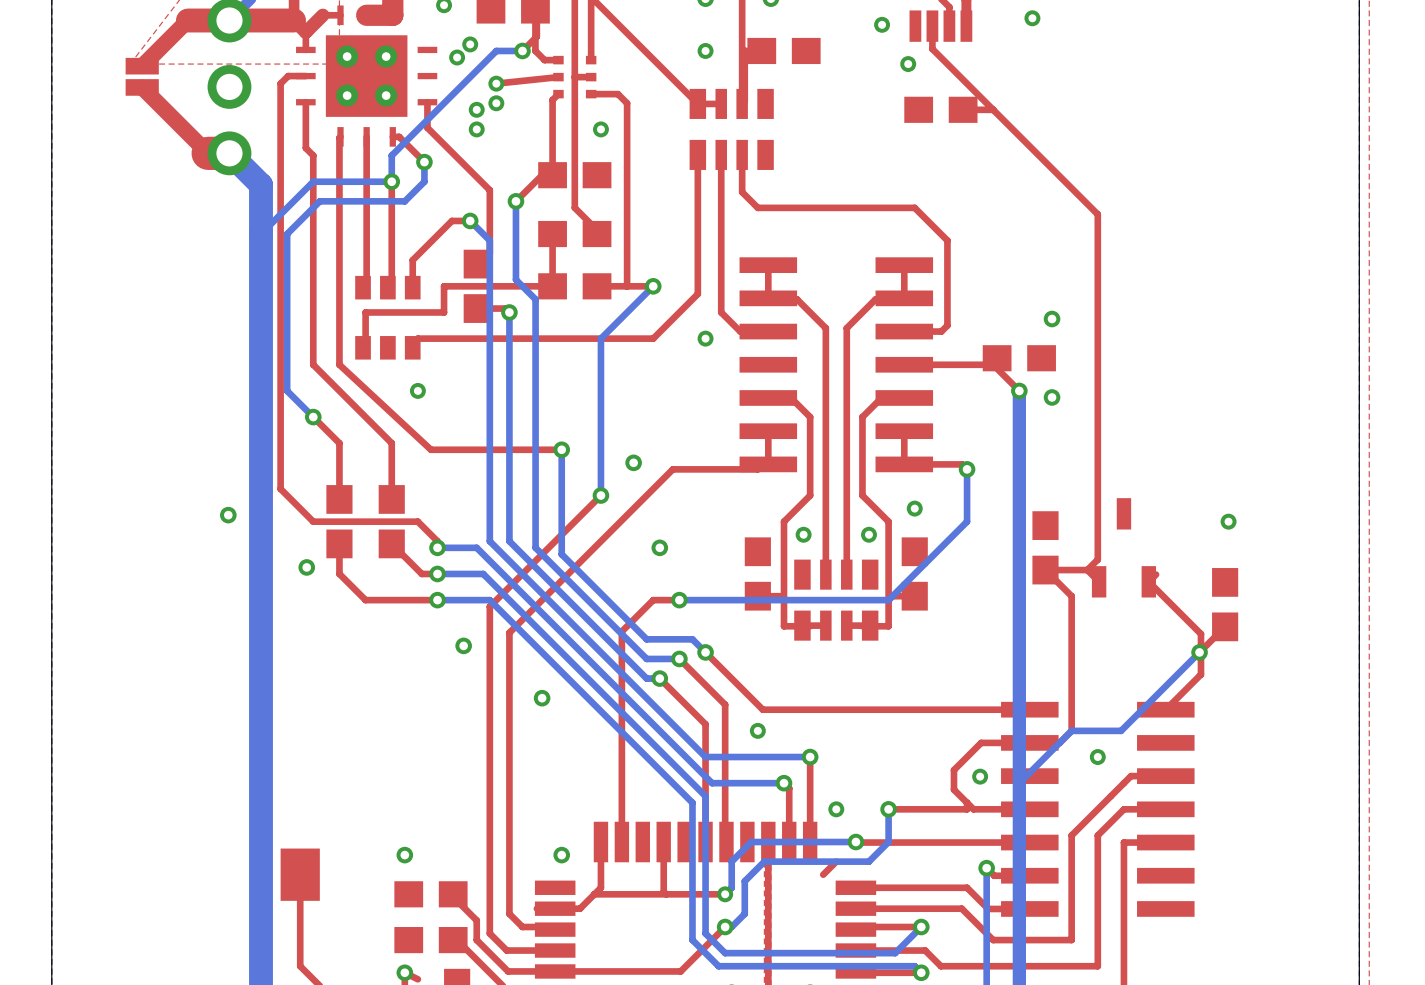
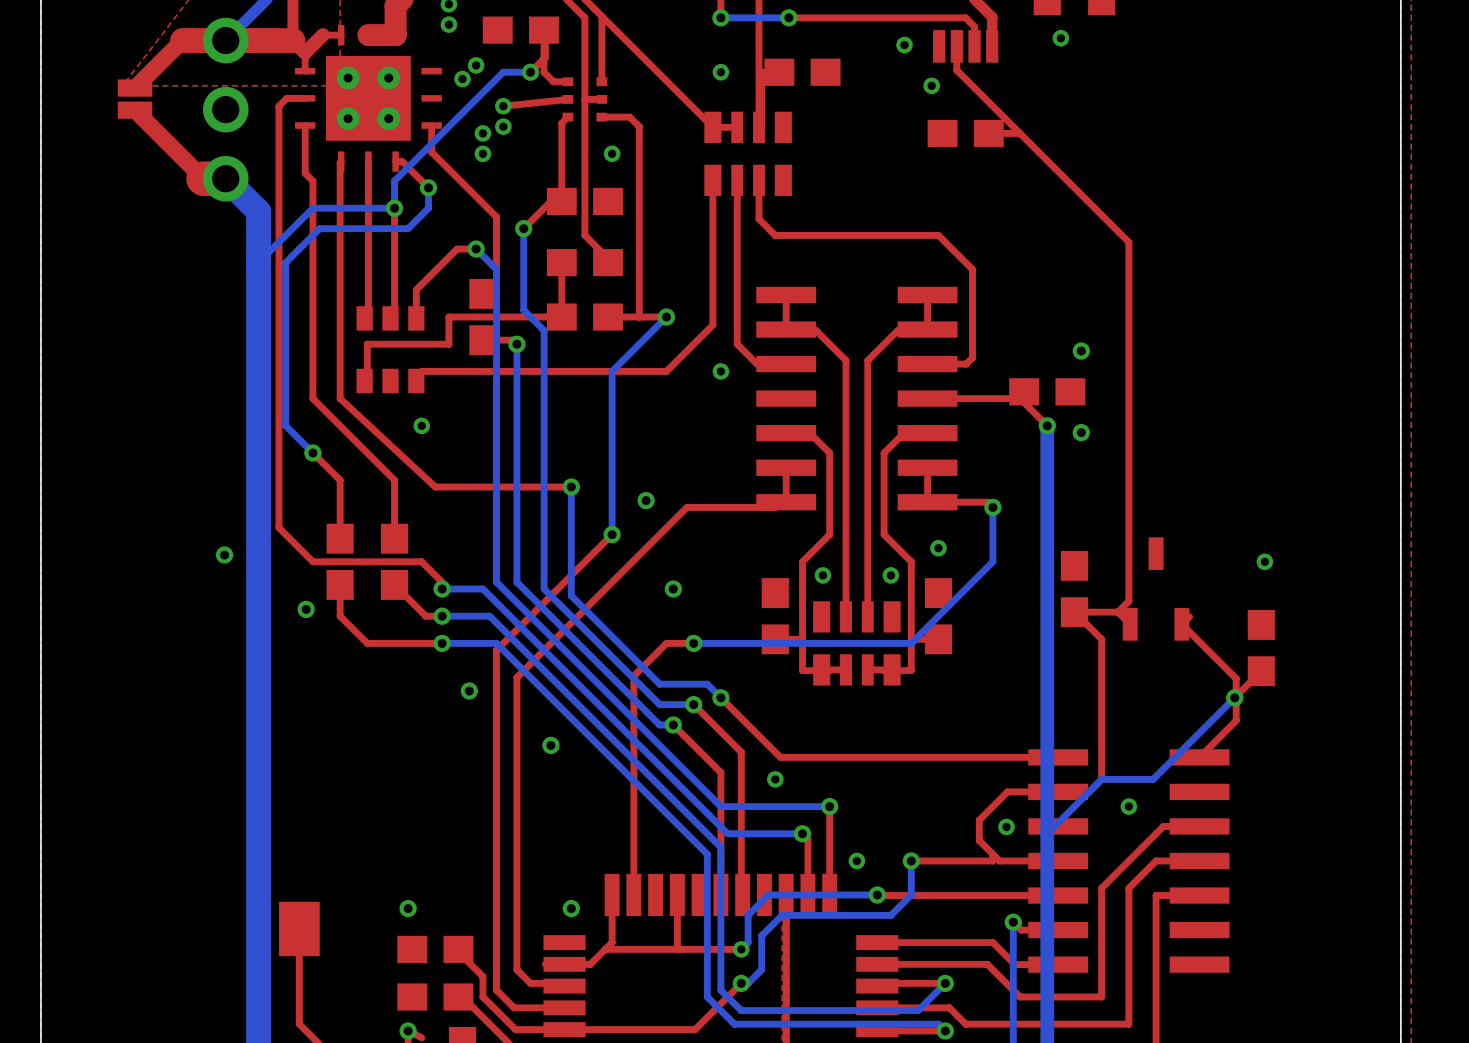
top track: (836, 861) (823, 874) -> none

